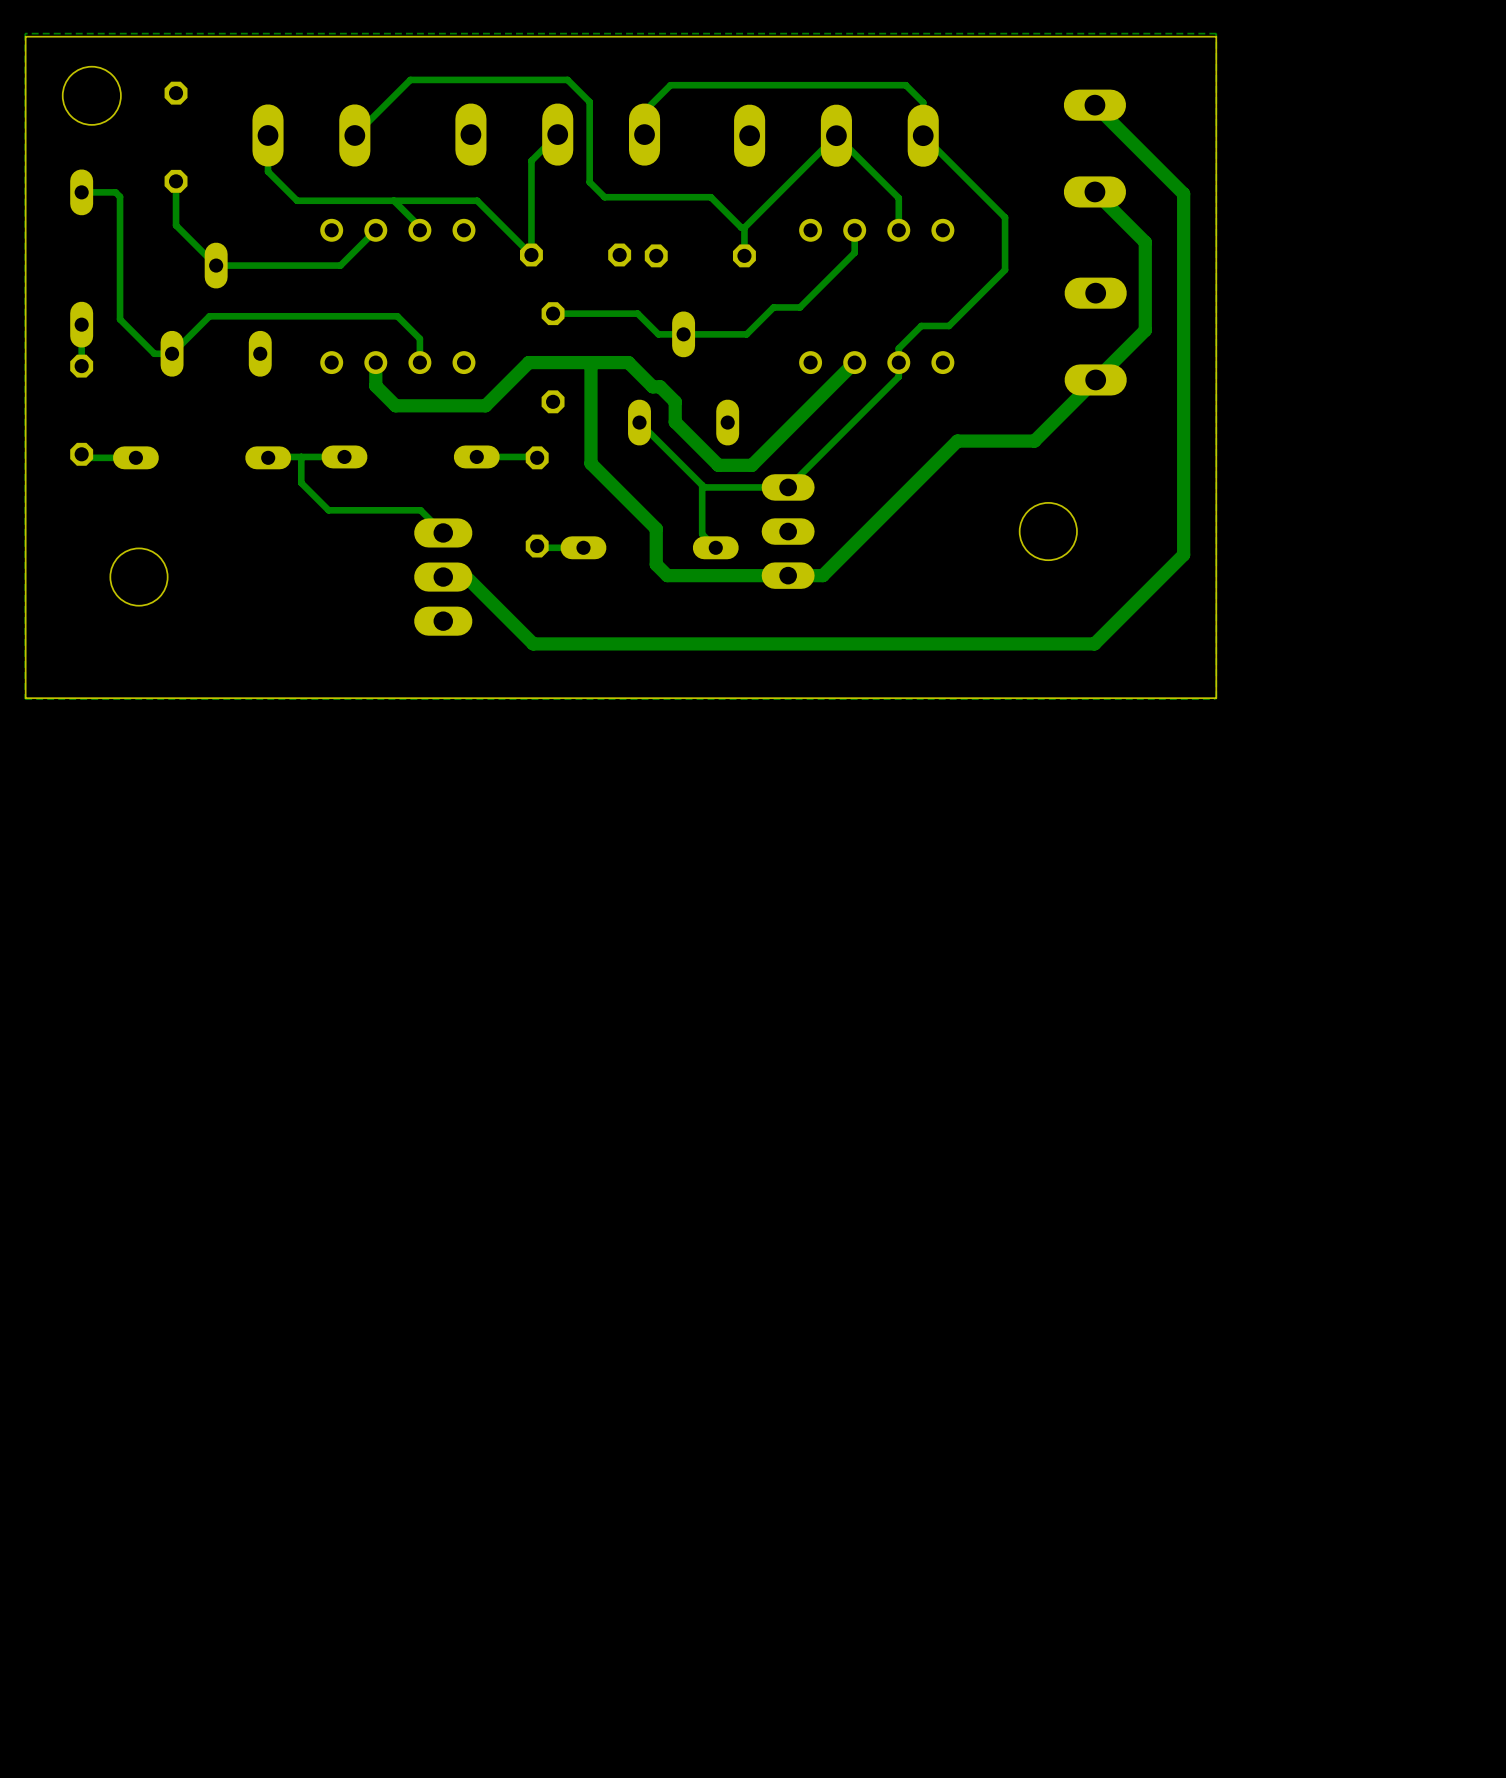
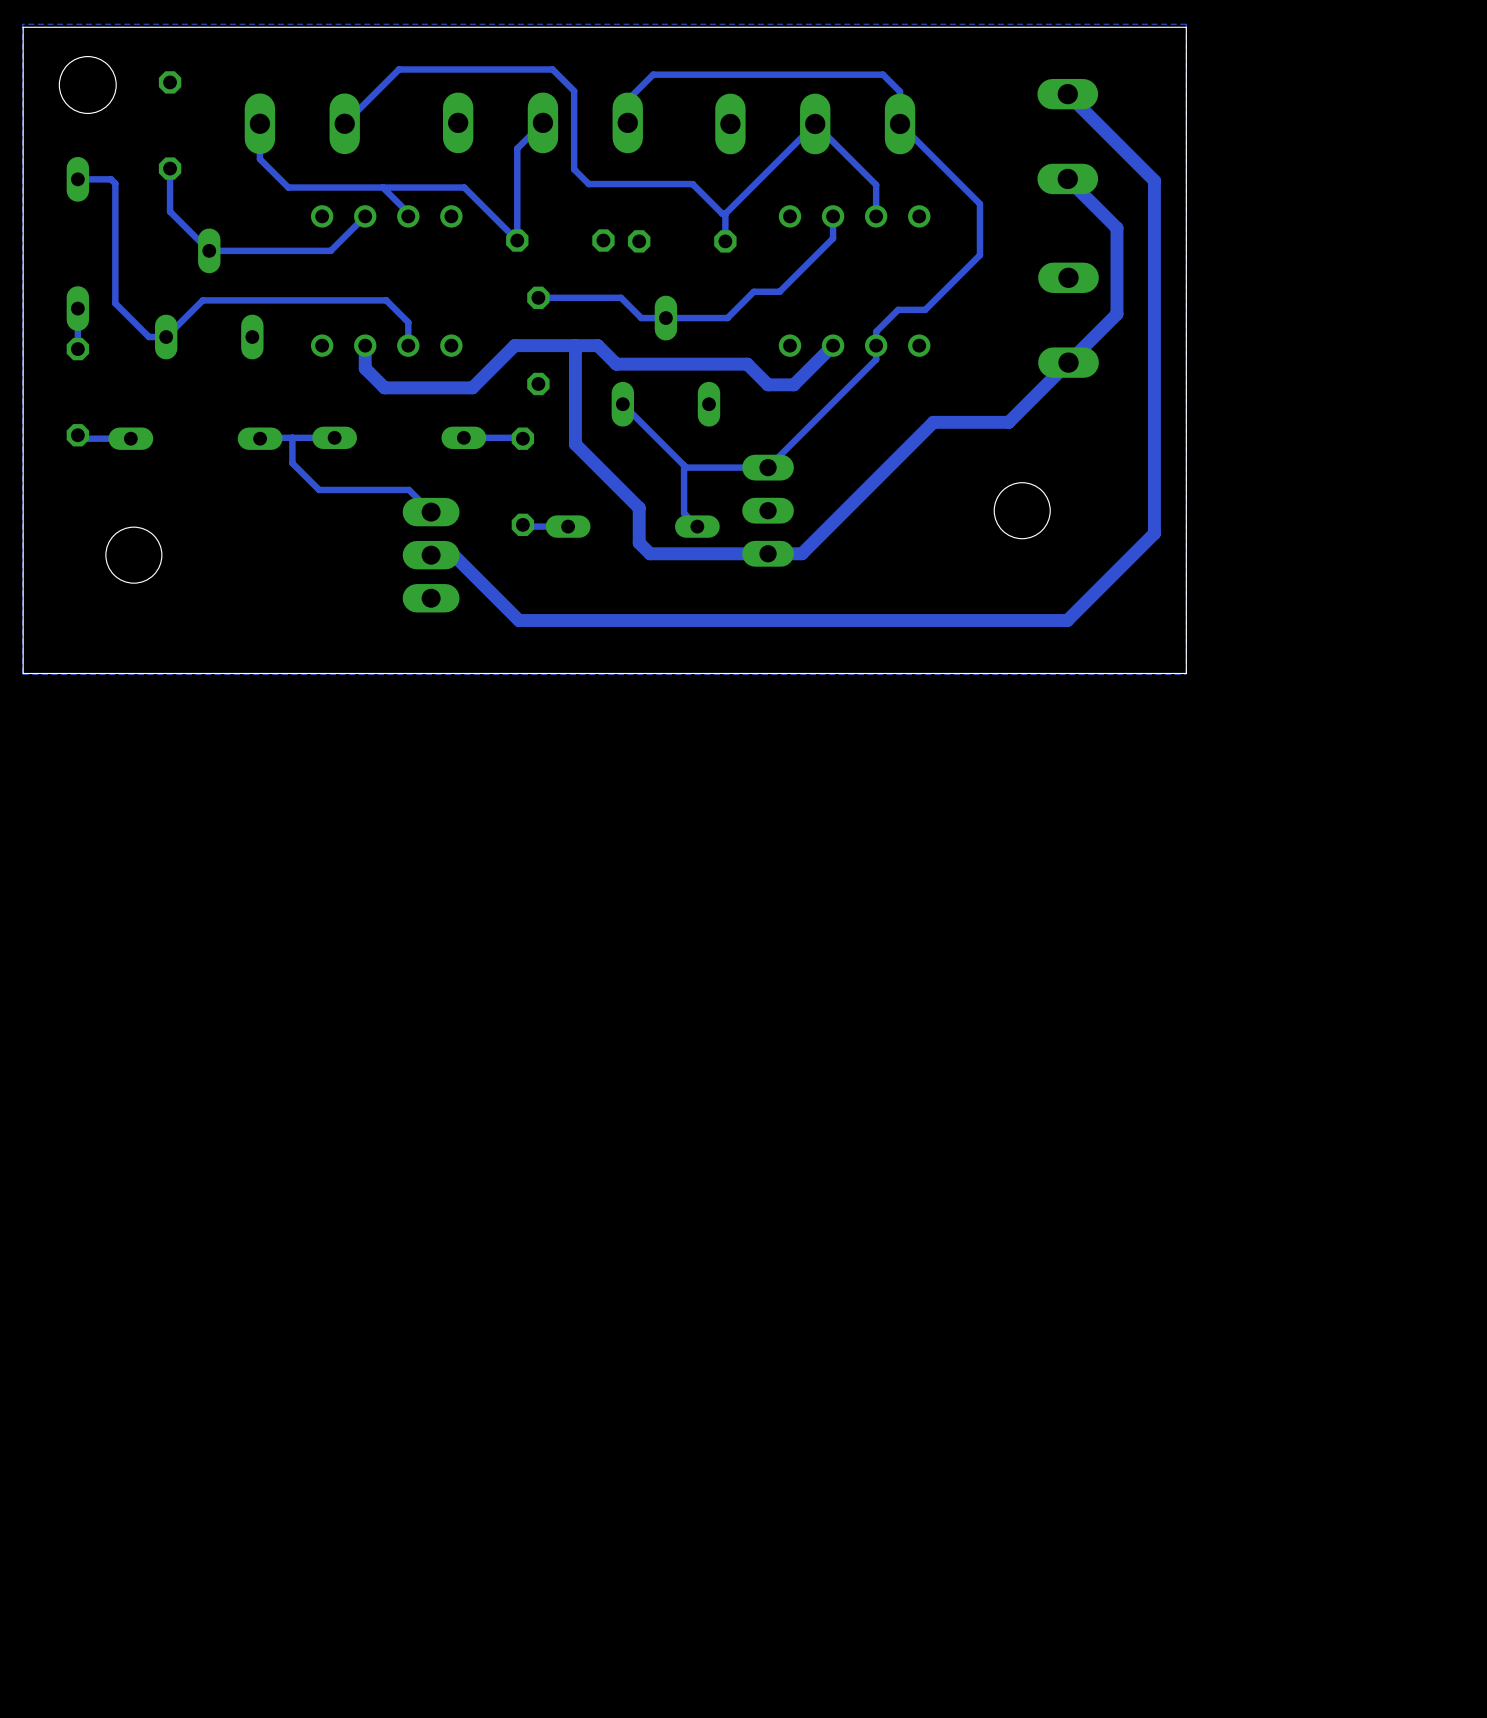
track: (613, 362) (628, 362) (652, 386) (660, 386) (675, 401) (675, 422) (718, 465) (751, 465) (814, 402) -> (597, 345) (616, 364) (747, 364) (768, 384) (793, 384)

